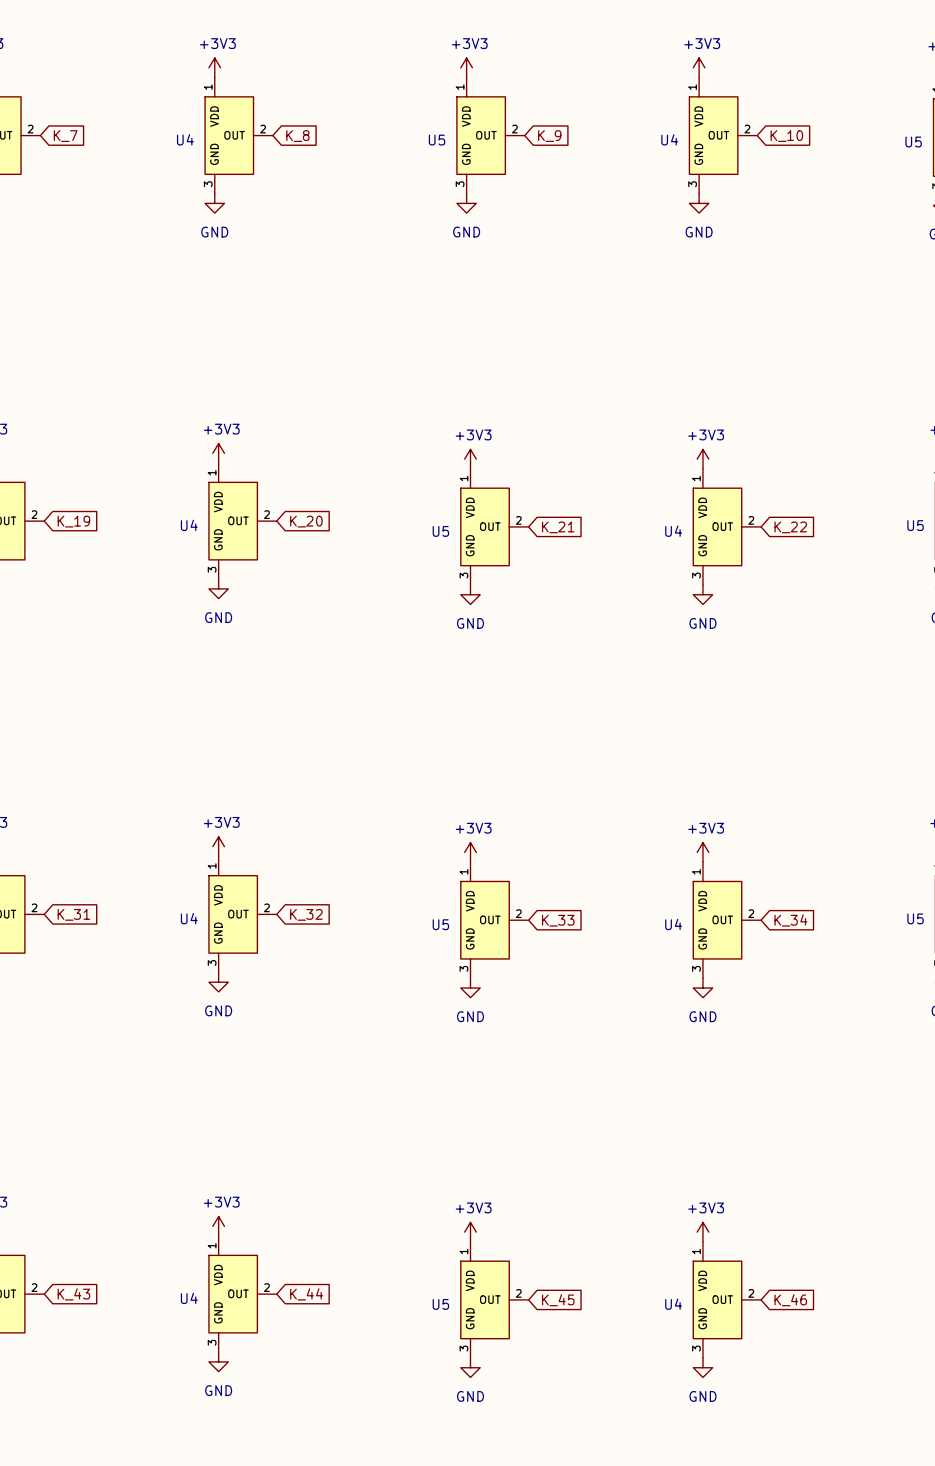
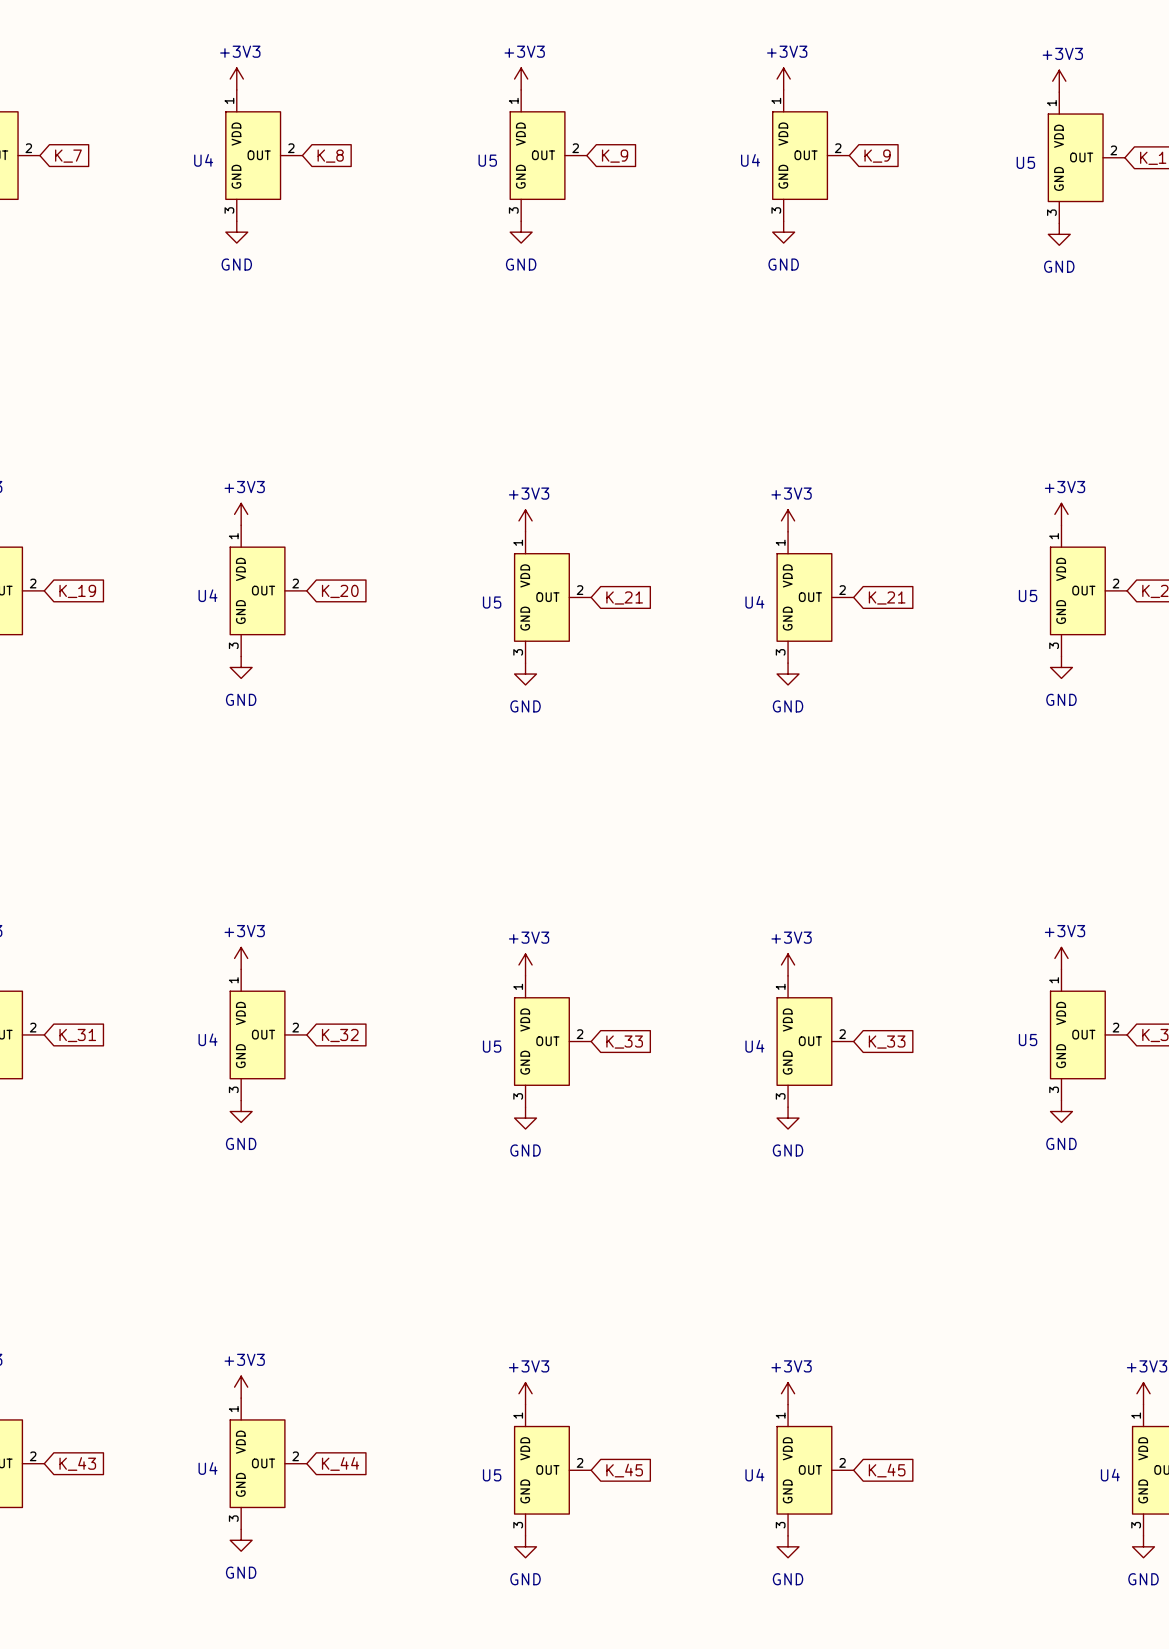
global label: K_10 (786, 136) -> K_9 (877, 156)
global label: K_22 (790, 527) -> K_21 (887, 597)
global label: K_34 (790, 920) -> K_33 (887, 1042)
global label: K_46 (790, 1300) -> K_45 (887, 1470)

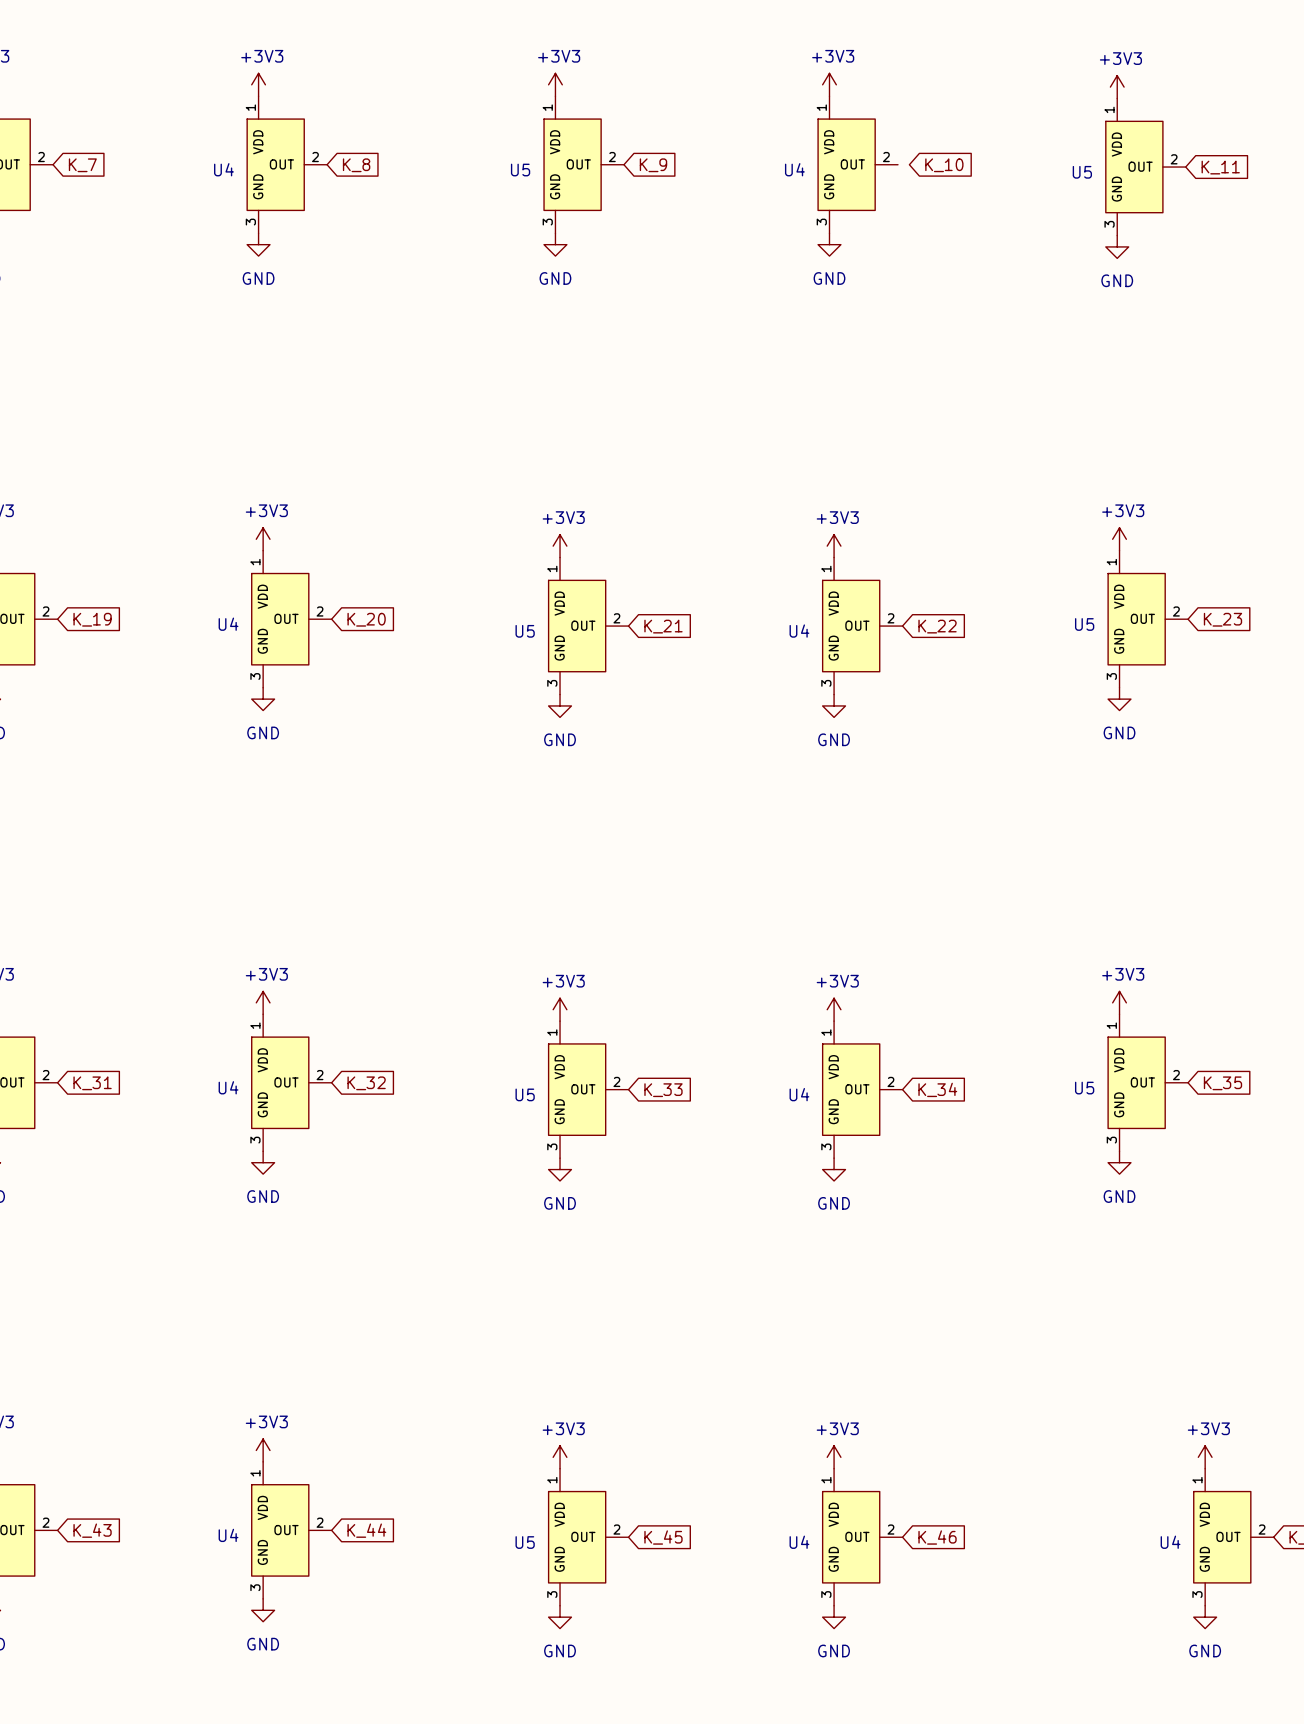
global label: K_9 (877, 156) -> none
global label: none -> K_10 (944, 165)
global label: K_21 (887, 597) -> K_22 (937, 626)
global label: K_33 (887, 1042) -> K_34 (937, 1089)
global label: K_45 (887, 1470) -> K_46 (937, 1537)

